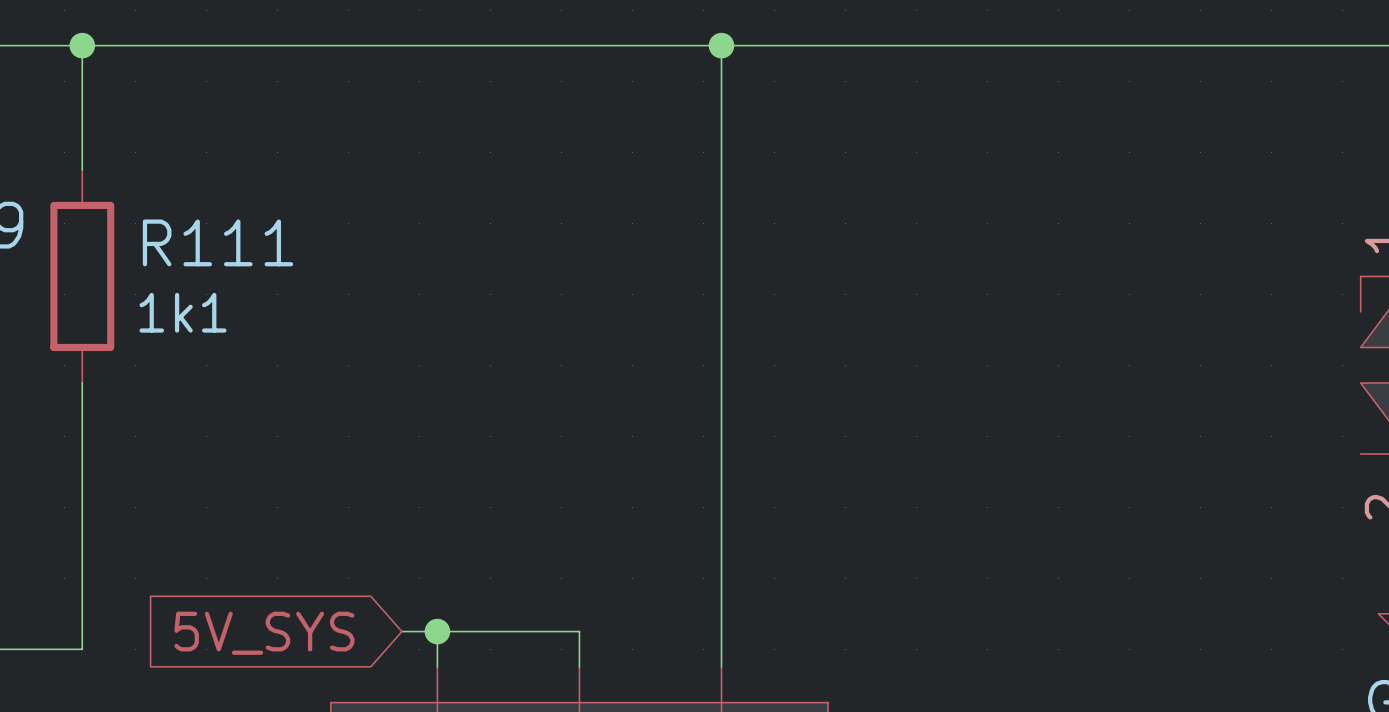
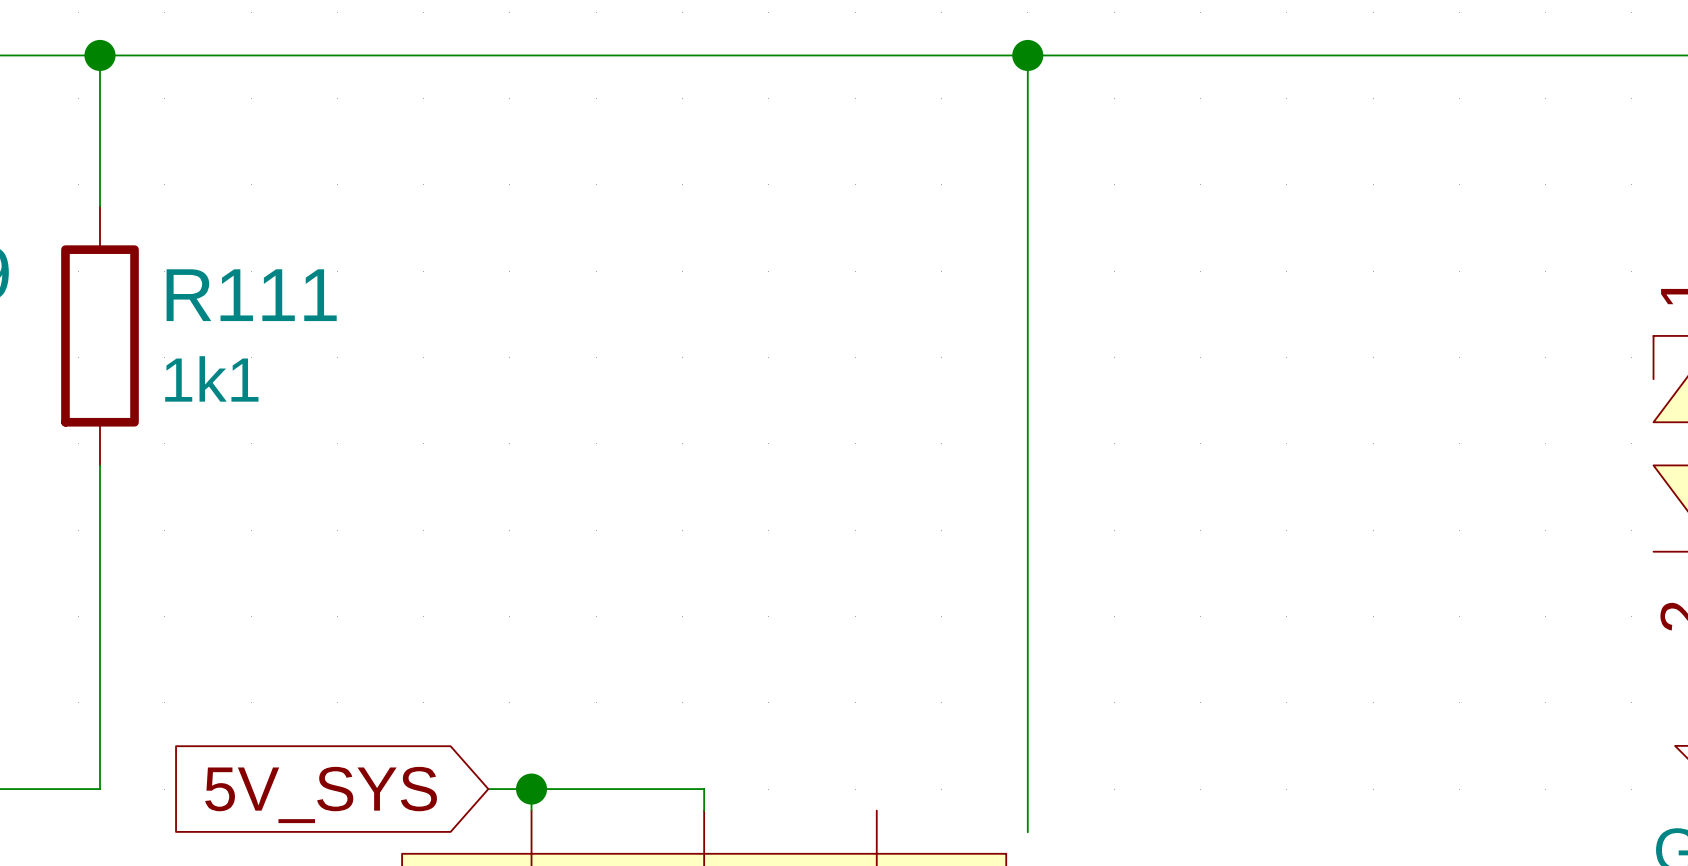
wire: (721, 45) (721, 667) -> none
junction position: (721, 45) -> (1027, 55)
wire: none -> (1027, 55) (1027, 832)
wire: (401, 631) (579, 631) (579, 649) -> (488, 789) (704, 789)
junction position: (437, 631) -> (531, 789)
global label position: 5V_SYS (264, 633) -> 5V_SYS (321, 794)

